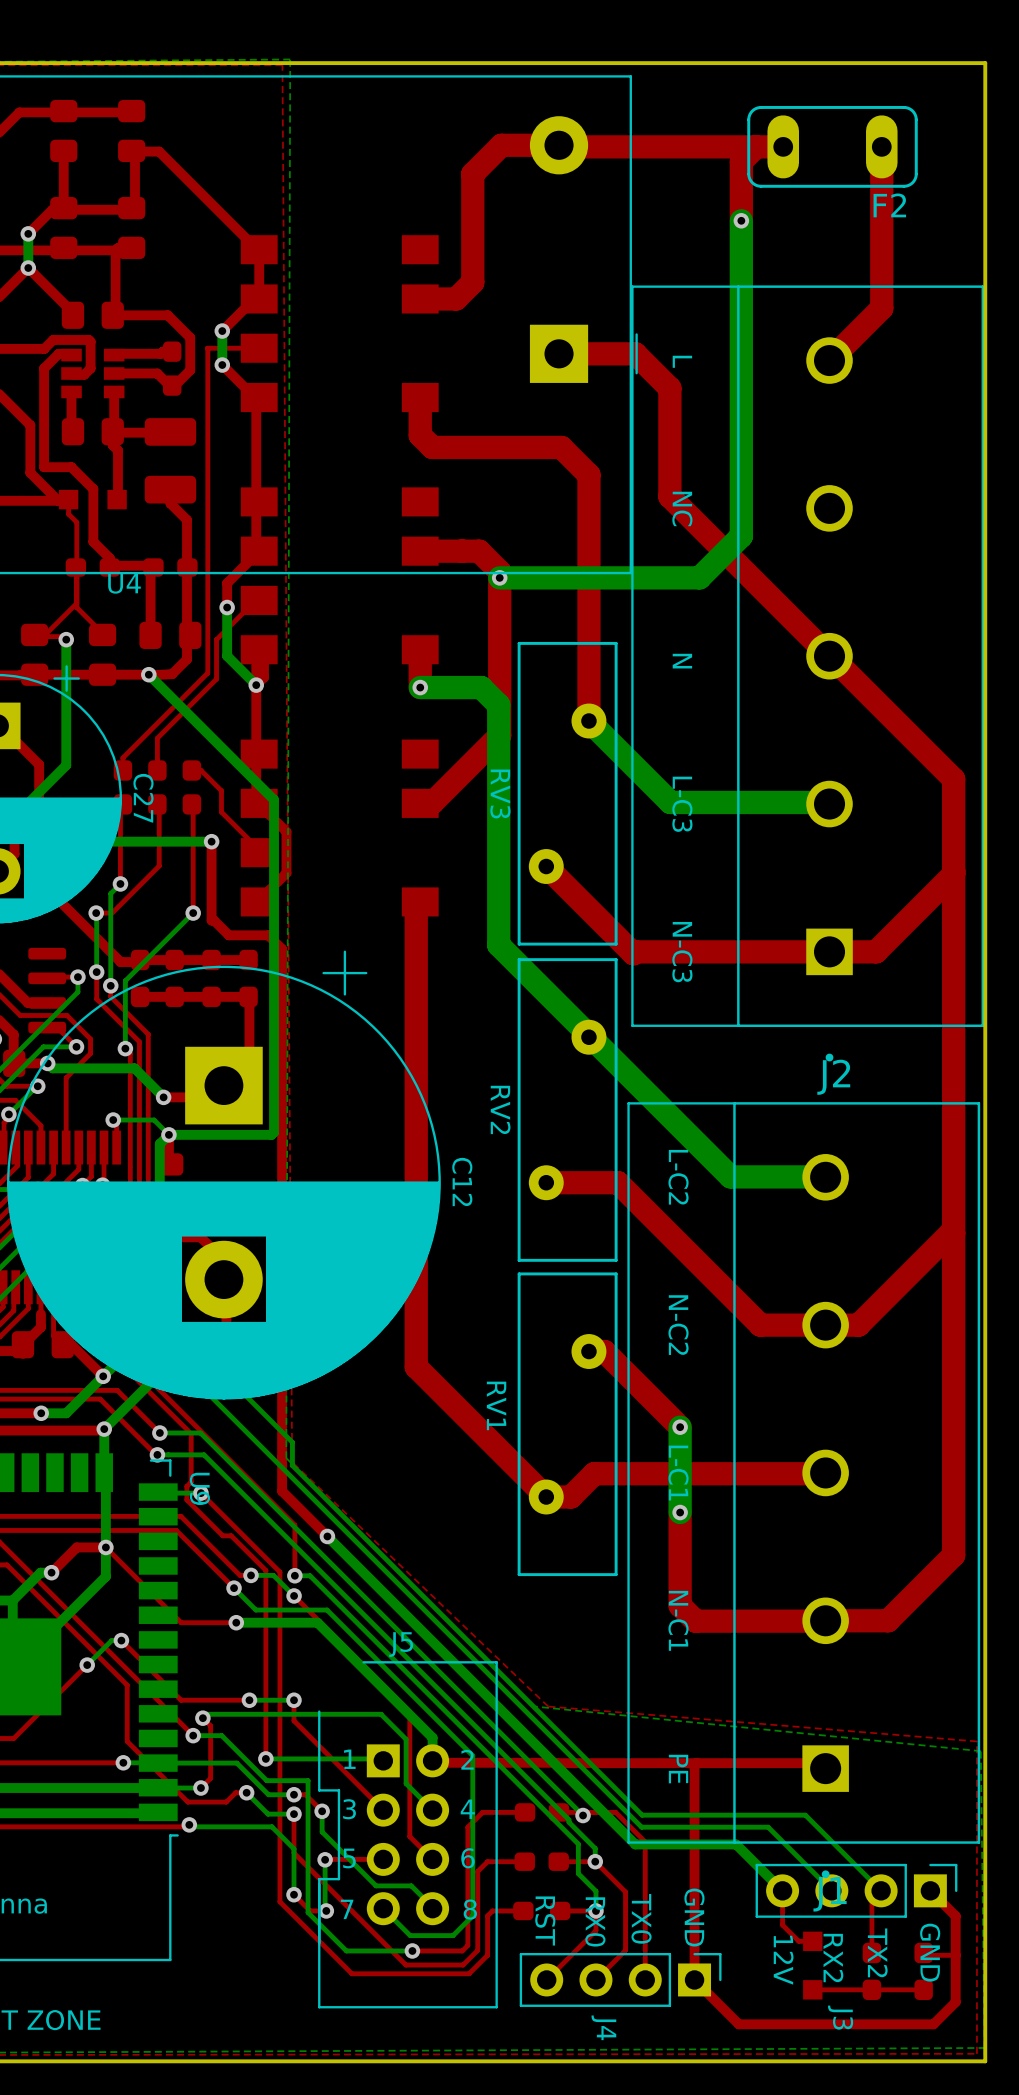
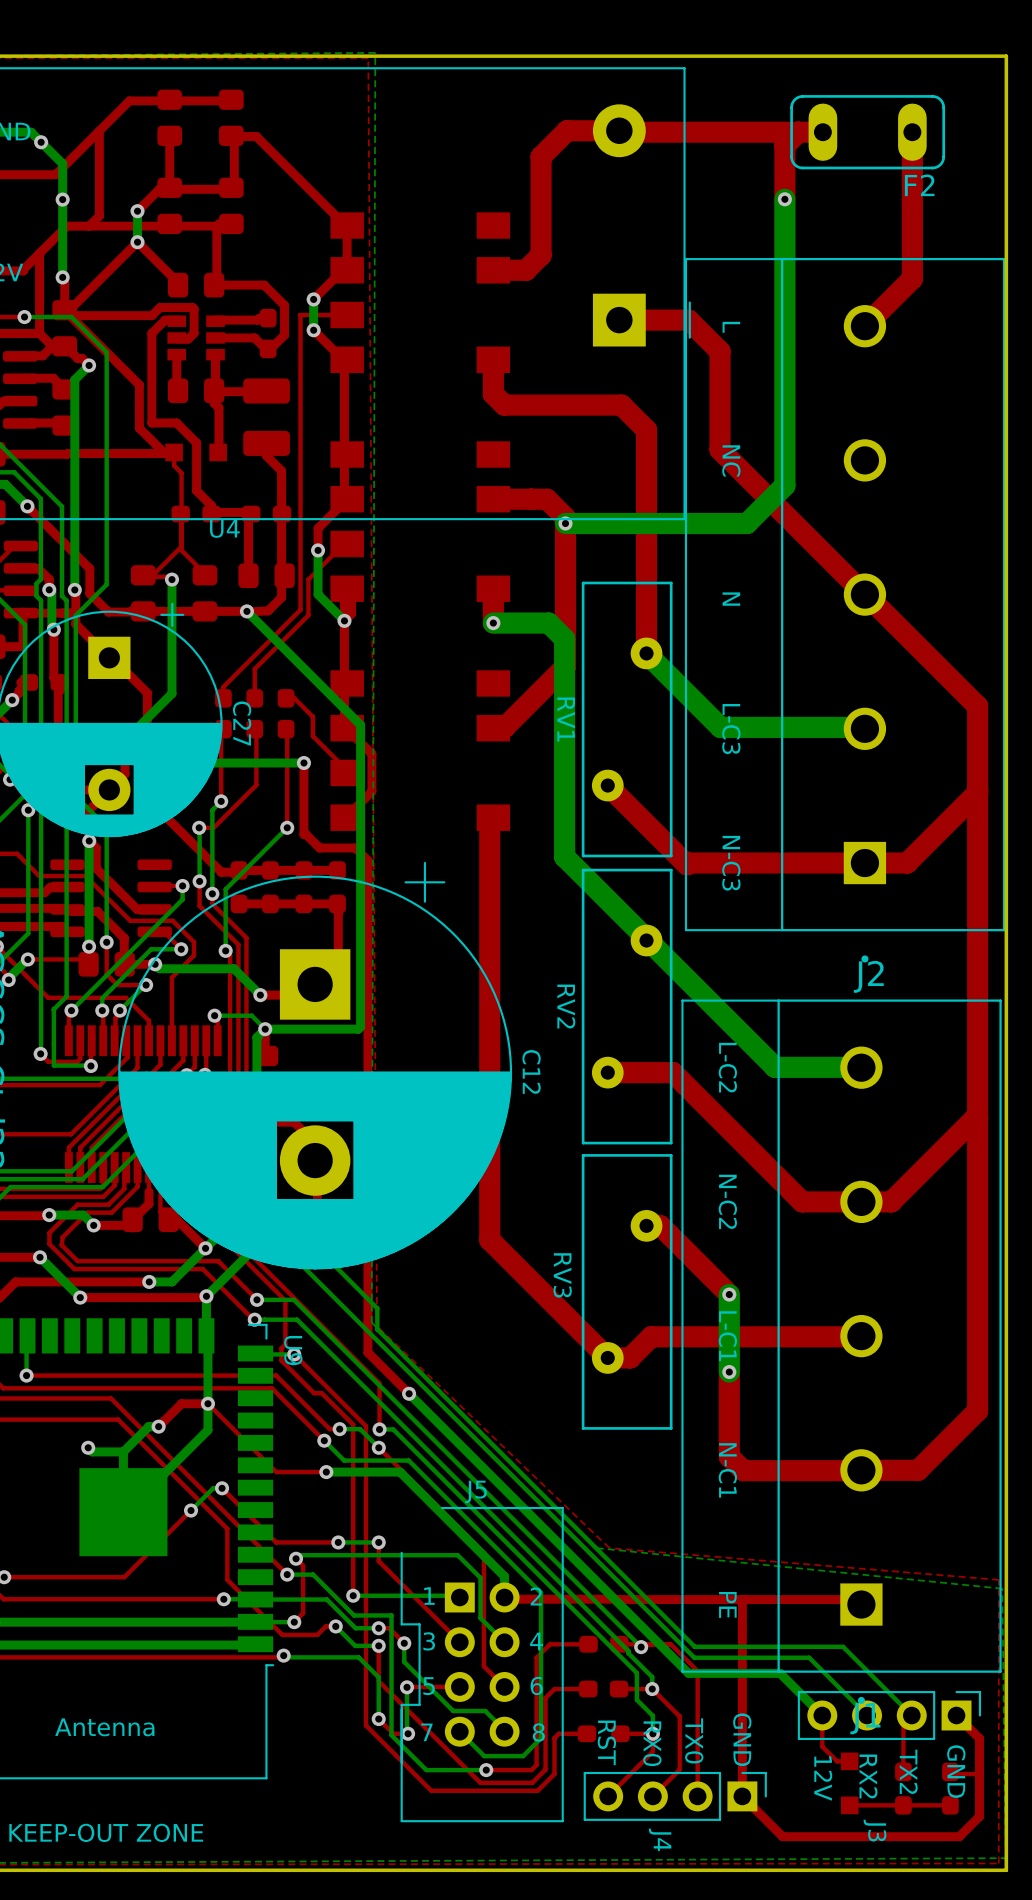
RV3 name: RV3 (500, 794) -> RV1 (566, 719)
RV1 name: RV1 (496, 1405) -> RV3 (562, 1275)

